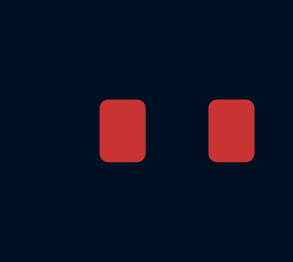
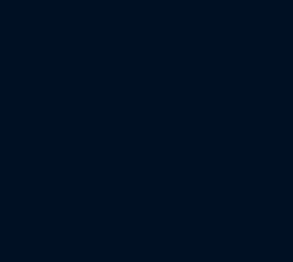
part: (177, 130) -> none

